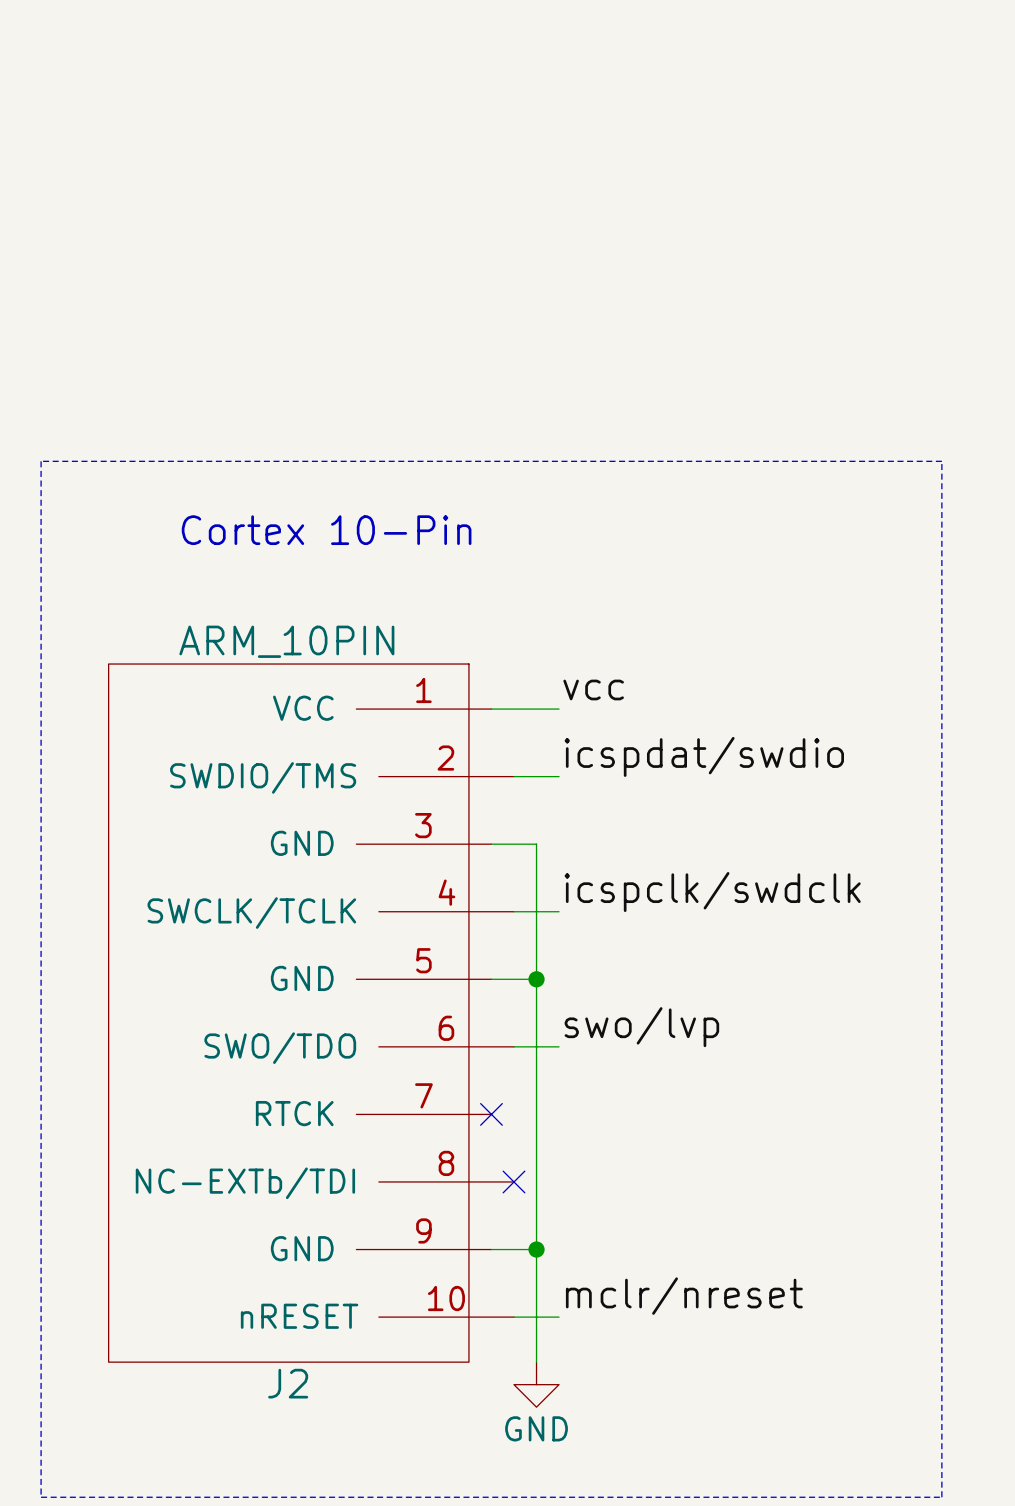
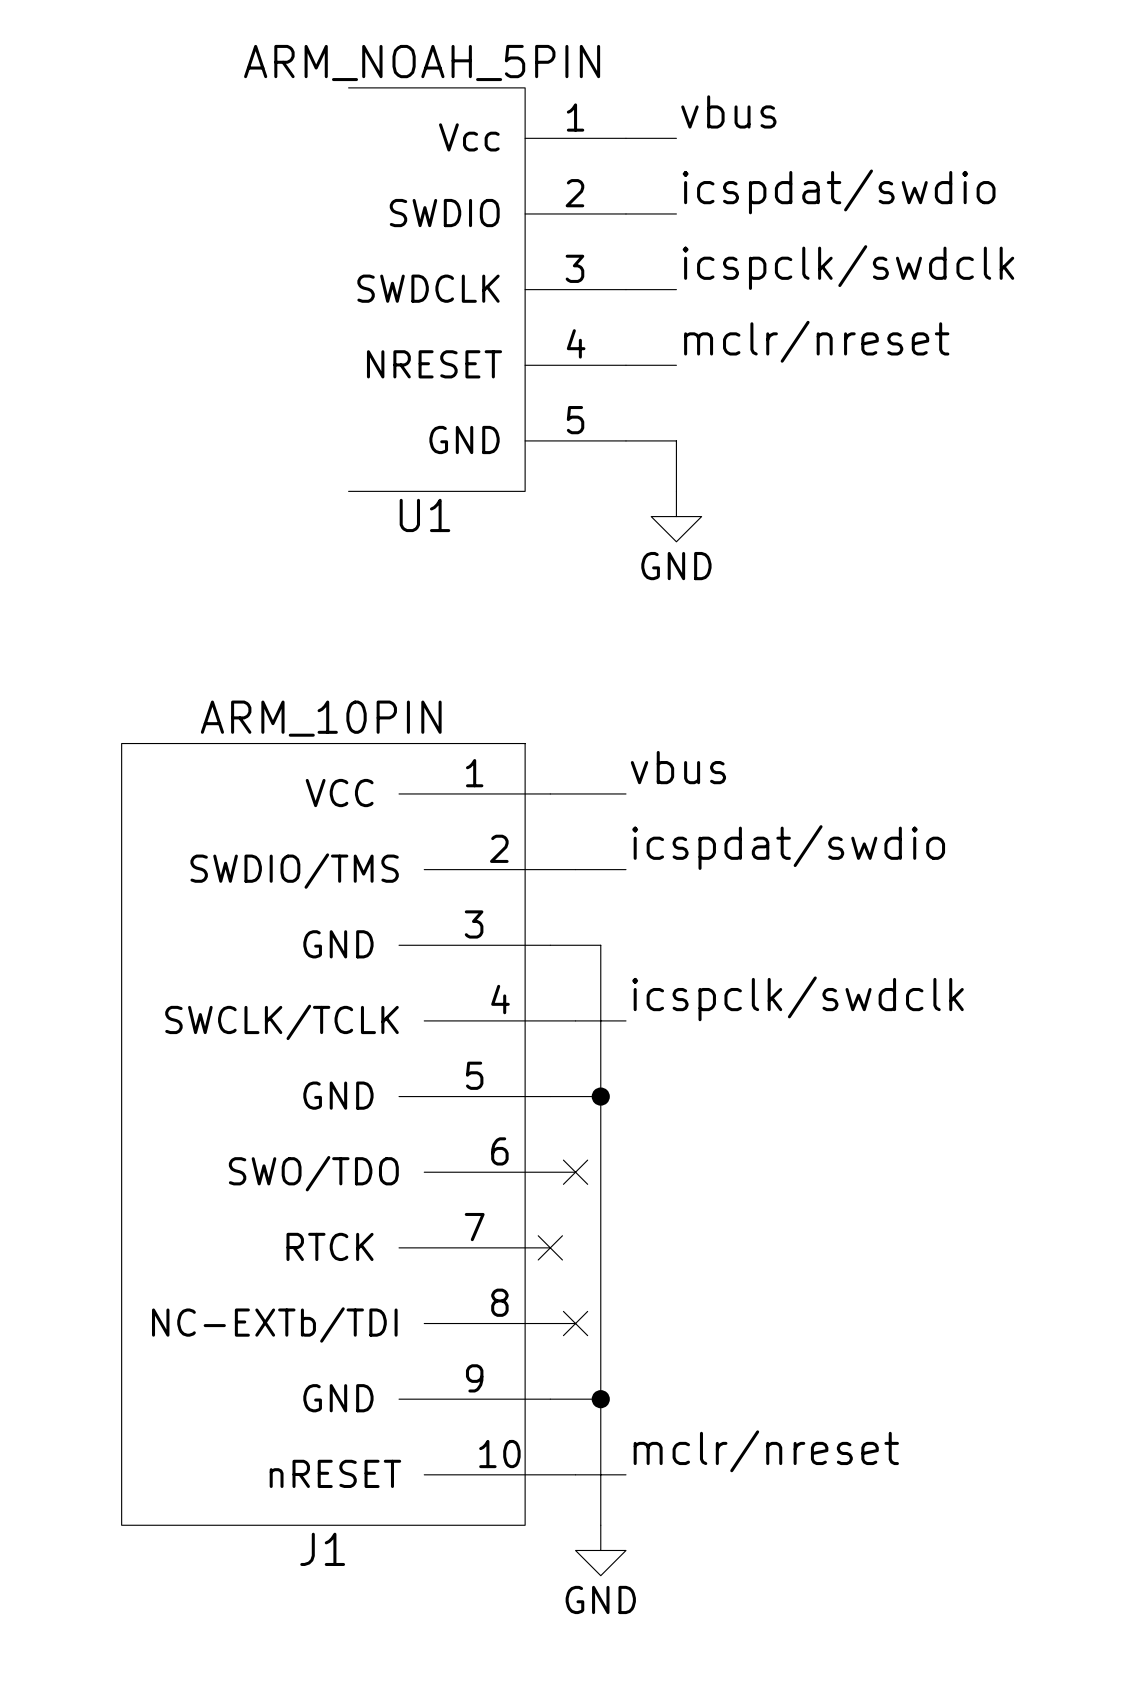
label: none -> vbus (728, 111)
wire: none -> (625, 138) (676, 138)
label: none -> icspdat/swdio (839, 191)
wire: none -> (625, 213) (676, 213)
label: none -> icspclk/swdclk (848, 267)
U1: none -> ARM_NOAH_5PIN (487, 289)
wire: none -> (625, 289) (676, 289)
label: none -> mclr/nreset (816, 341)
wire: none -> (625, 365) (676, 365)
wire: none -> (625, 440) (676, 440) (676, 491)
line: (41, 461) (41, 1497) (941, 1497) (941, 461) (41, 461) -> none
power symbol: none -> GND (676, 516)
text: Cortex 10-Pin (326, 530) -> none
label: vcc (593, 689) -> vbus (678, 767)
label: swo/lvp (641, 1027) -> none
wire: (514, 1046) (559, 1046) -> none
no-connect mark: none -> (575, 1172)
J2 name: J2 (288, 1383) -> J1 (322, 1549)

